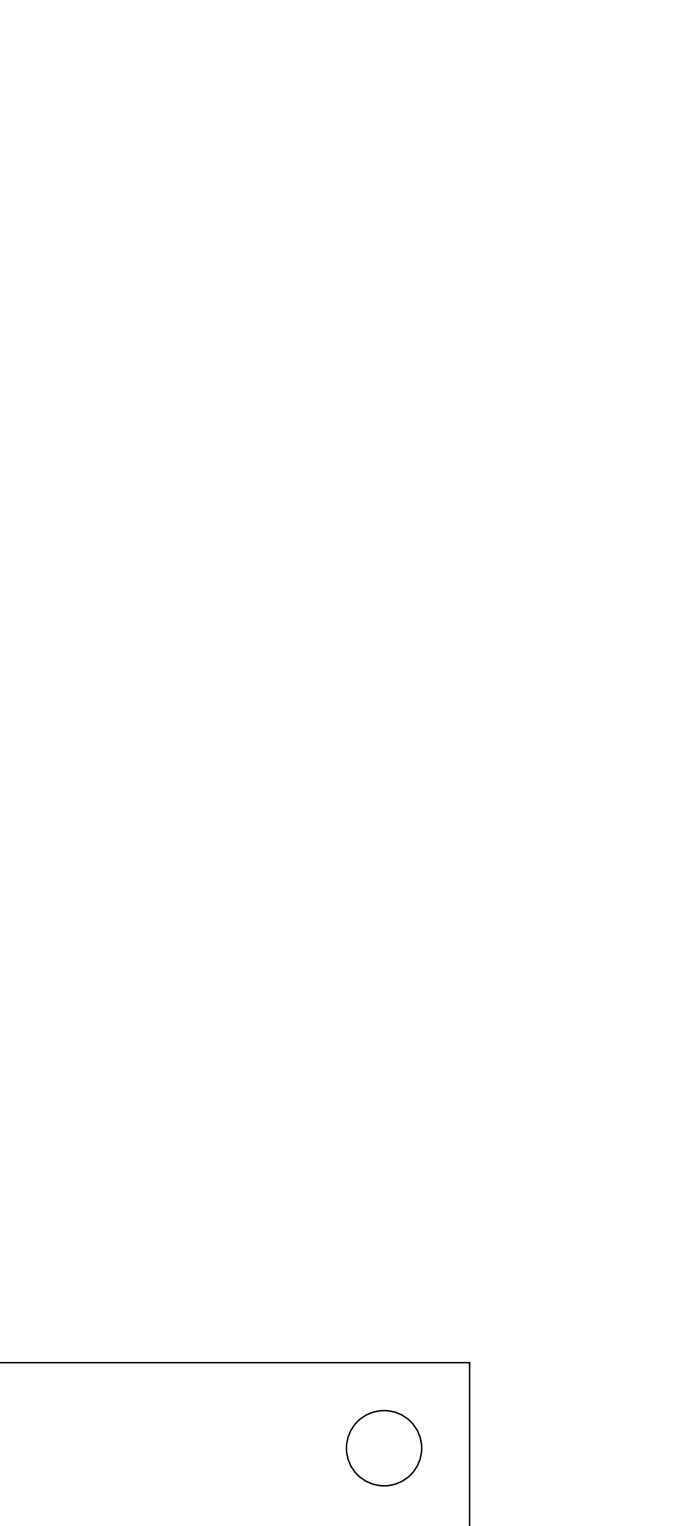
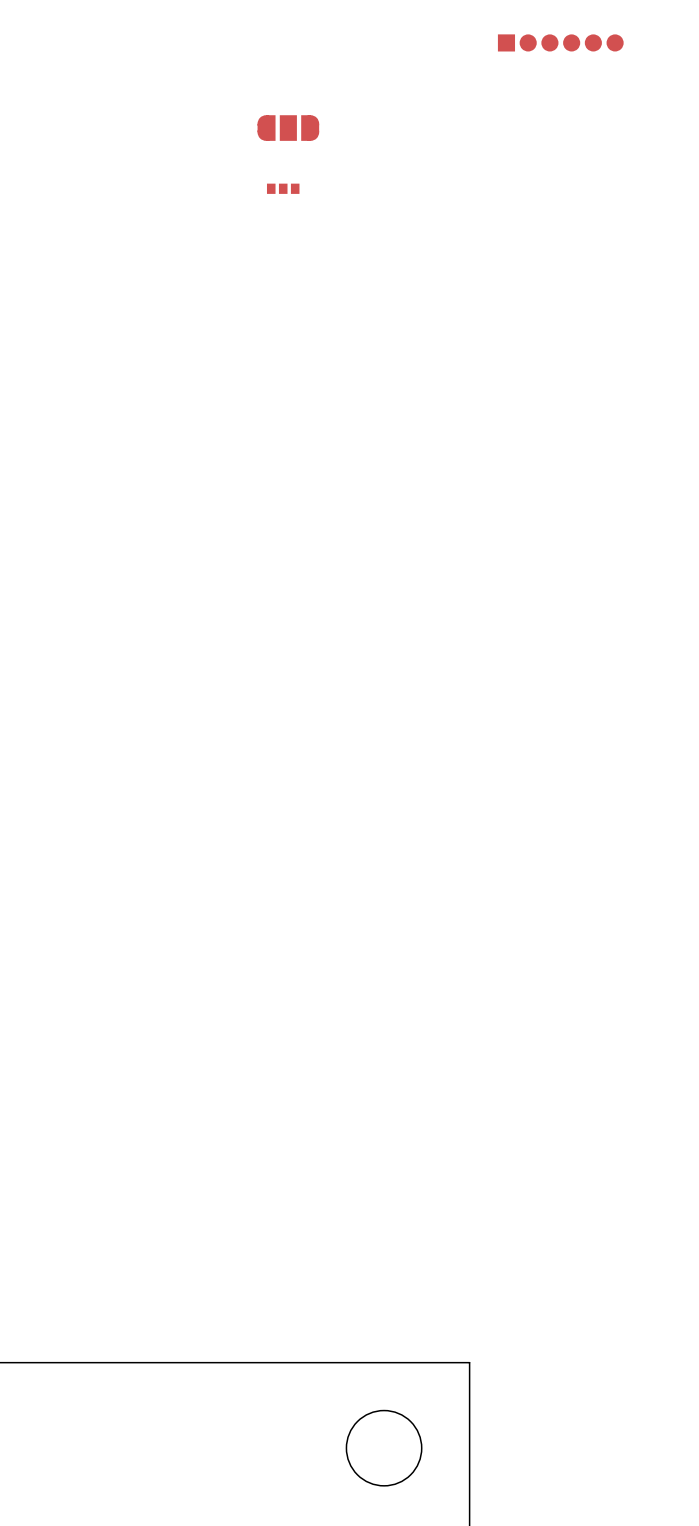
part: none -> (560, 42)
part: none -> (288, 128)
part: none -> (283, 188)

